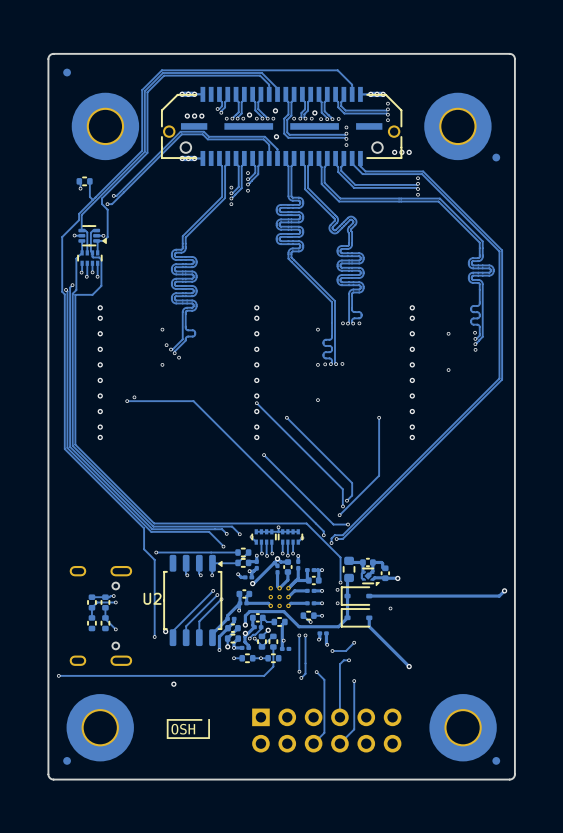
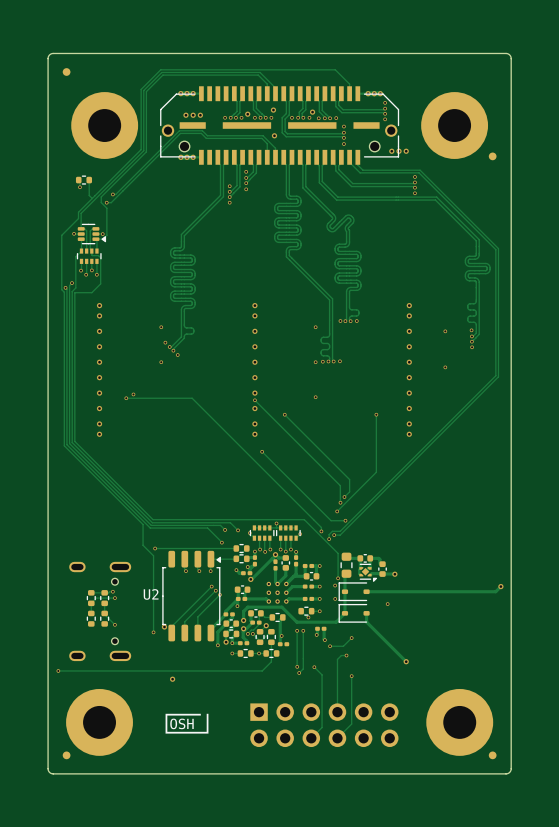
track: (219, 94) (222, 106) (217, 109) -> none
track: (227, 94) (225, 107) (221, 112) -> none
via: (217, 109) -> none
via: (221, 112) -> none

